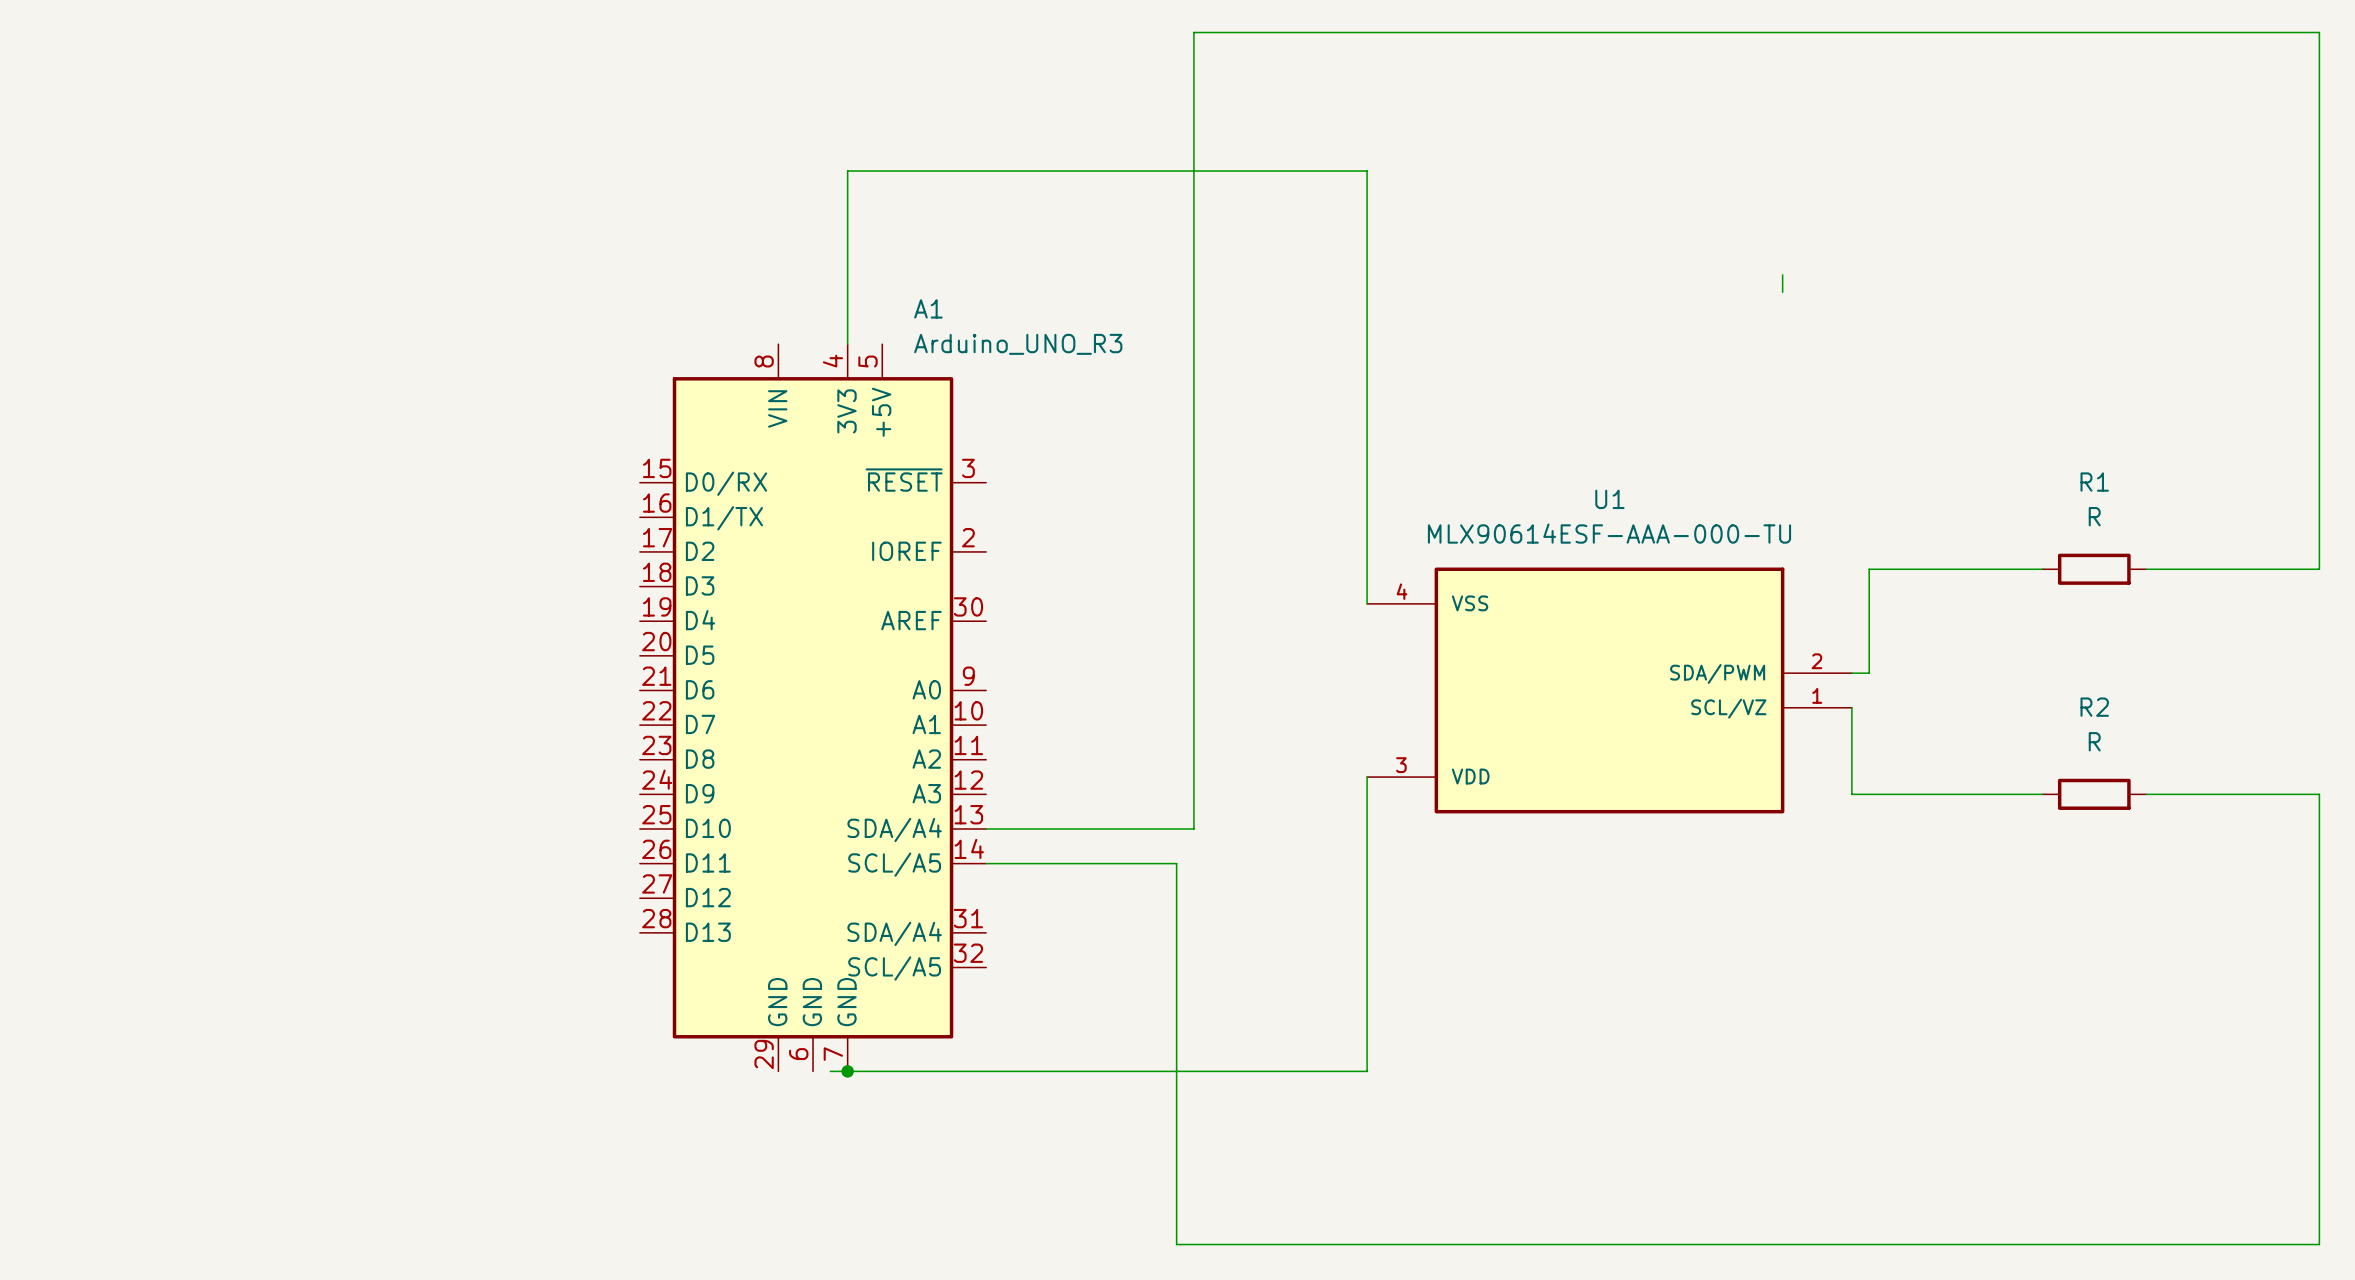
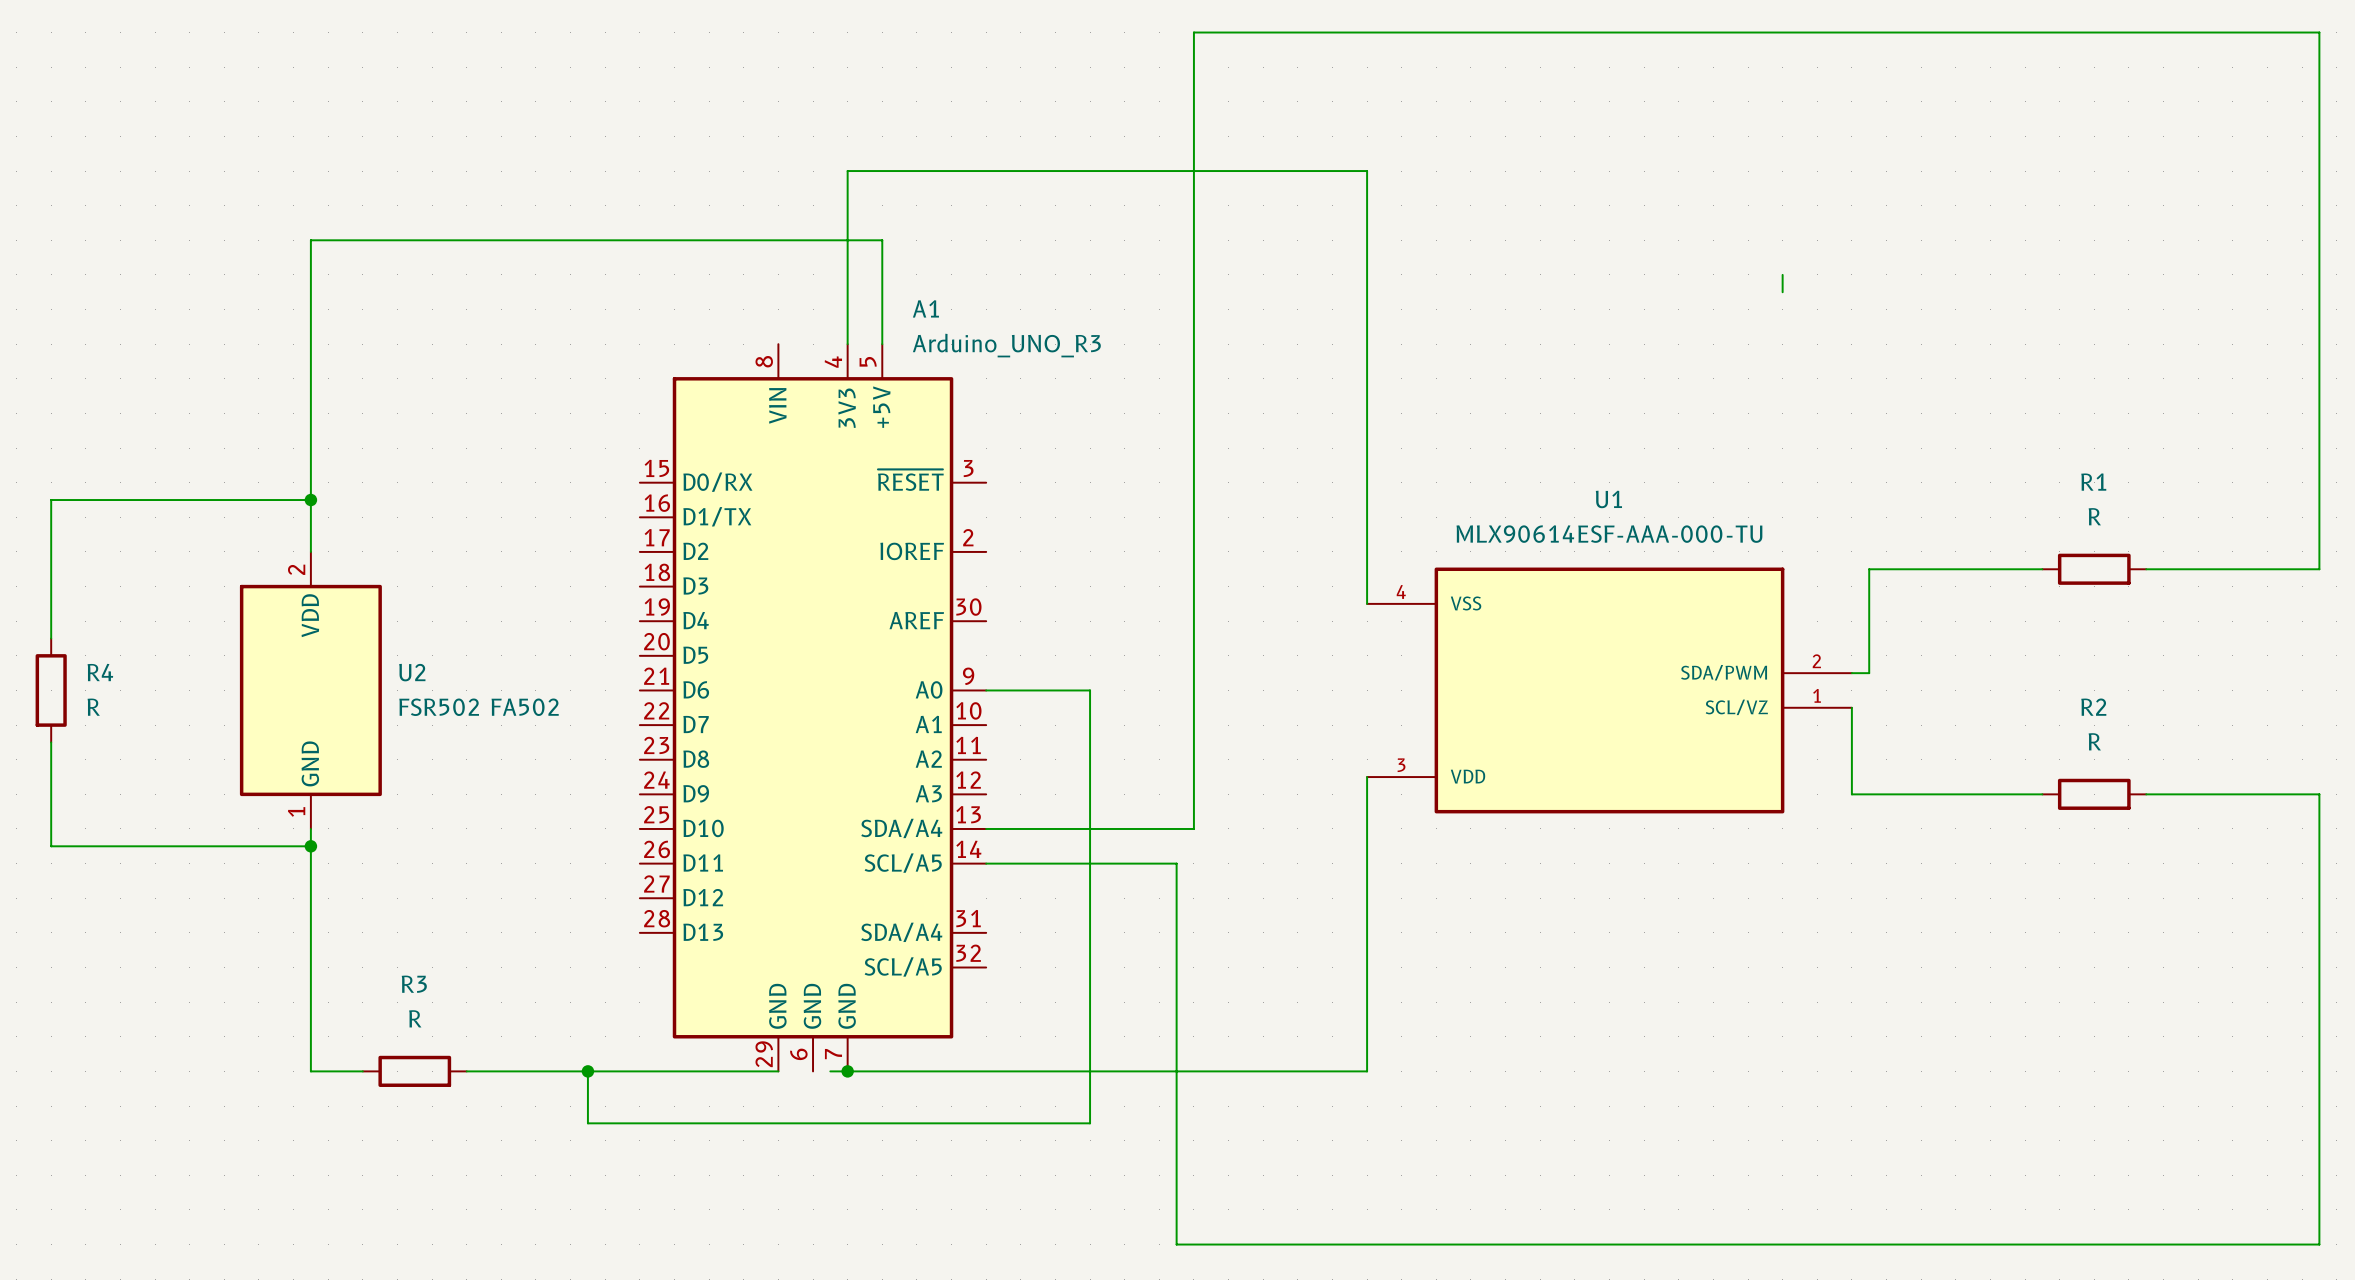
wire: none -> (882, 344) (882, 240) (310, 240) (310, 551)
wire: none -> (310, 500) (51, 500) (51, 638)
junction: none -> (310, 500)
R4: none -> R (51, 690)
U2: none -> FSR502 FA502 (310, 690)
wire: none -> (986, 690) (1090, 690) (1090, 1123) (587, 1123) (587, 1071)
wire: none -> (51, 742) (51, 846) (310, 846)
wire: none -> (310, 828) (310, 1071) (362, 1071)
junction: none -> (310, 846)
R3: none -> R (414, 1071)
wire: none -> (466, 1071) (778, 1071)
junction: none -> (587, 1071)

